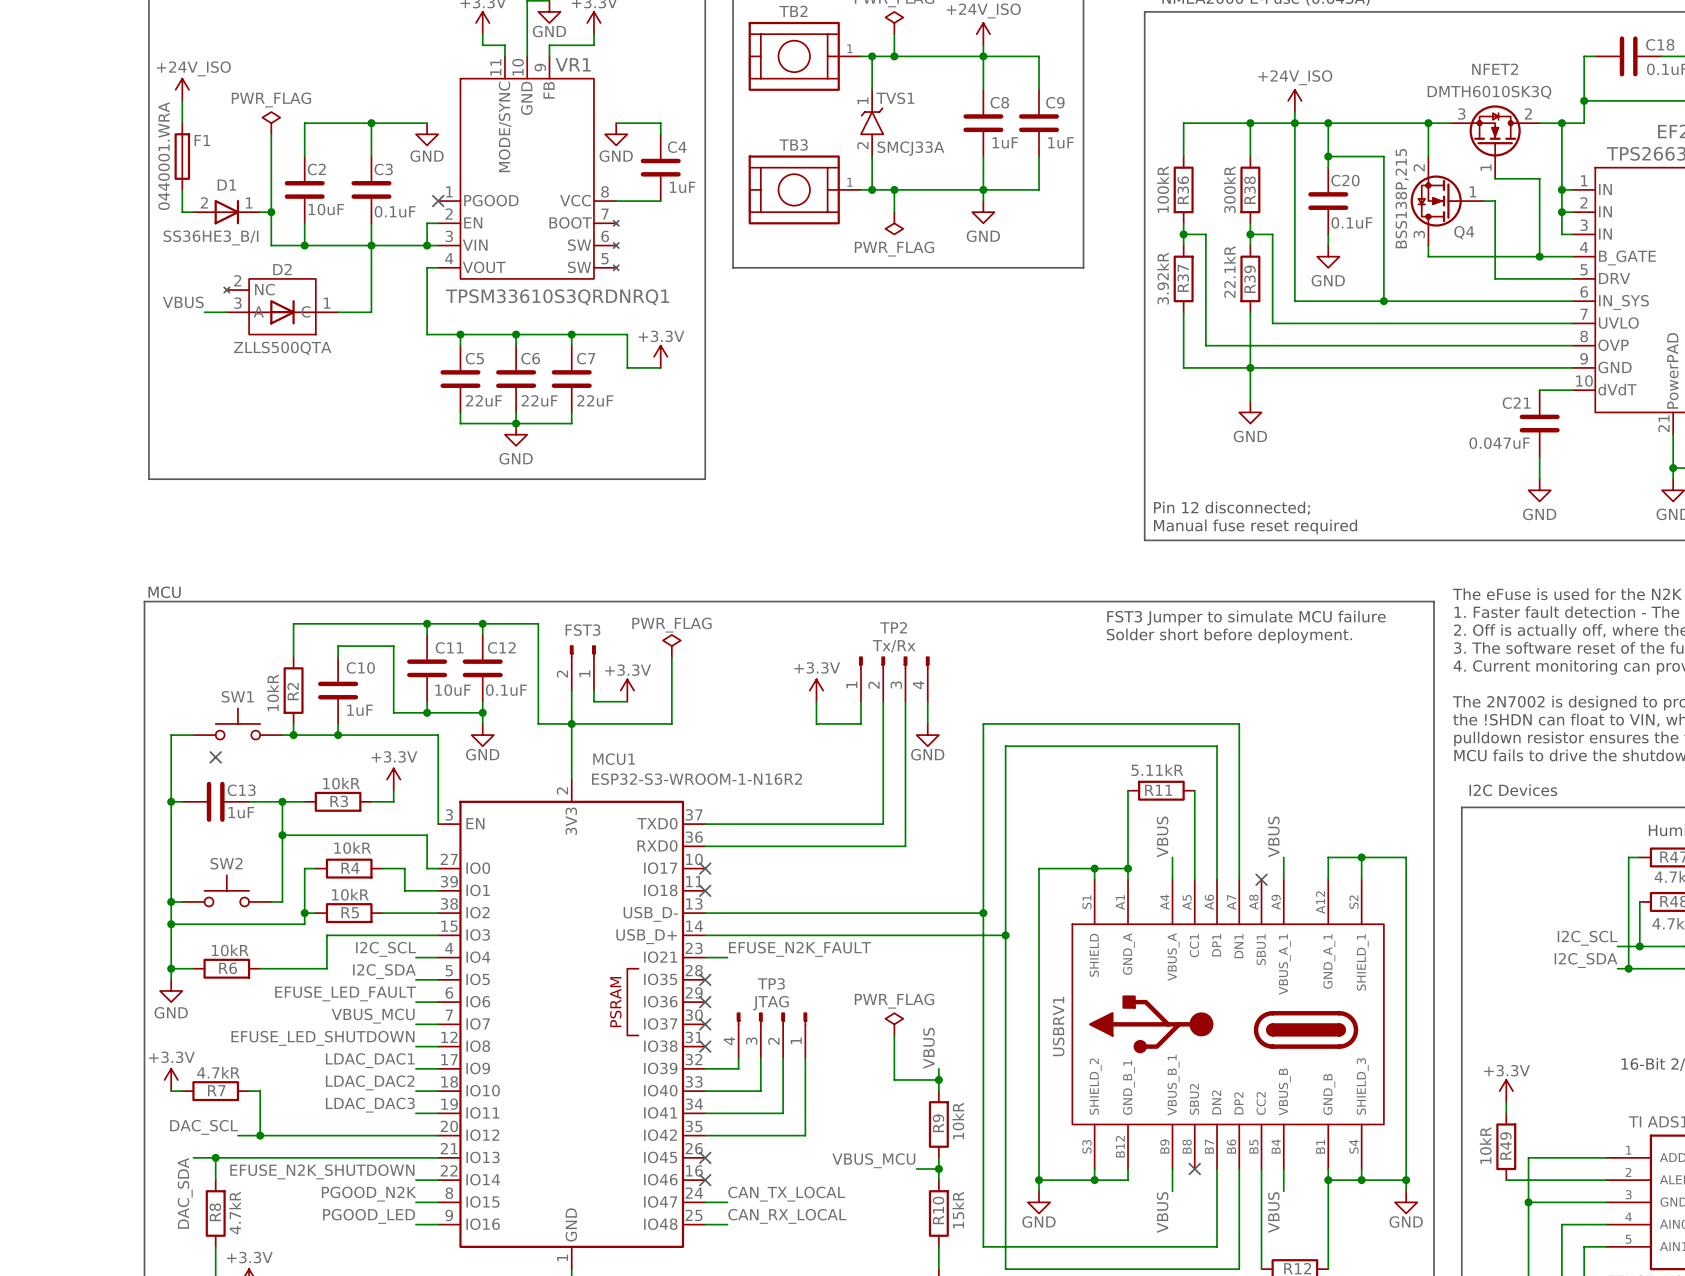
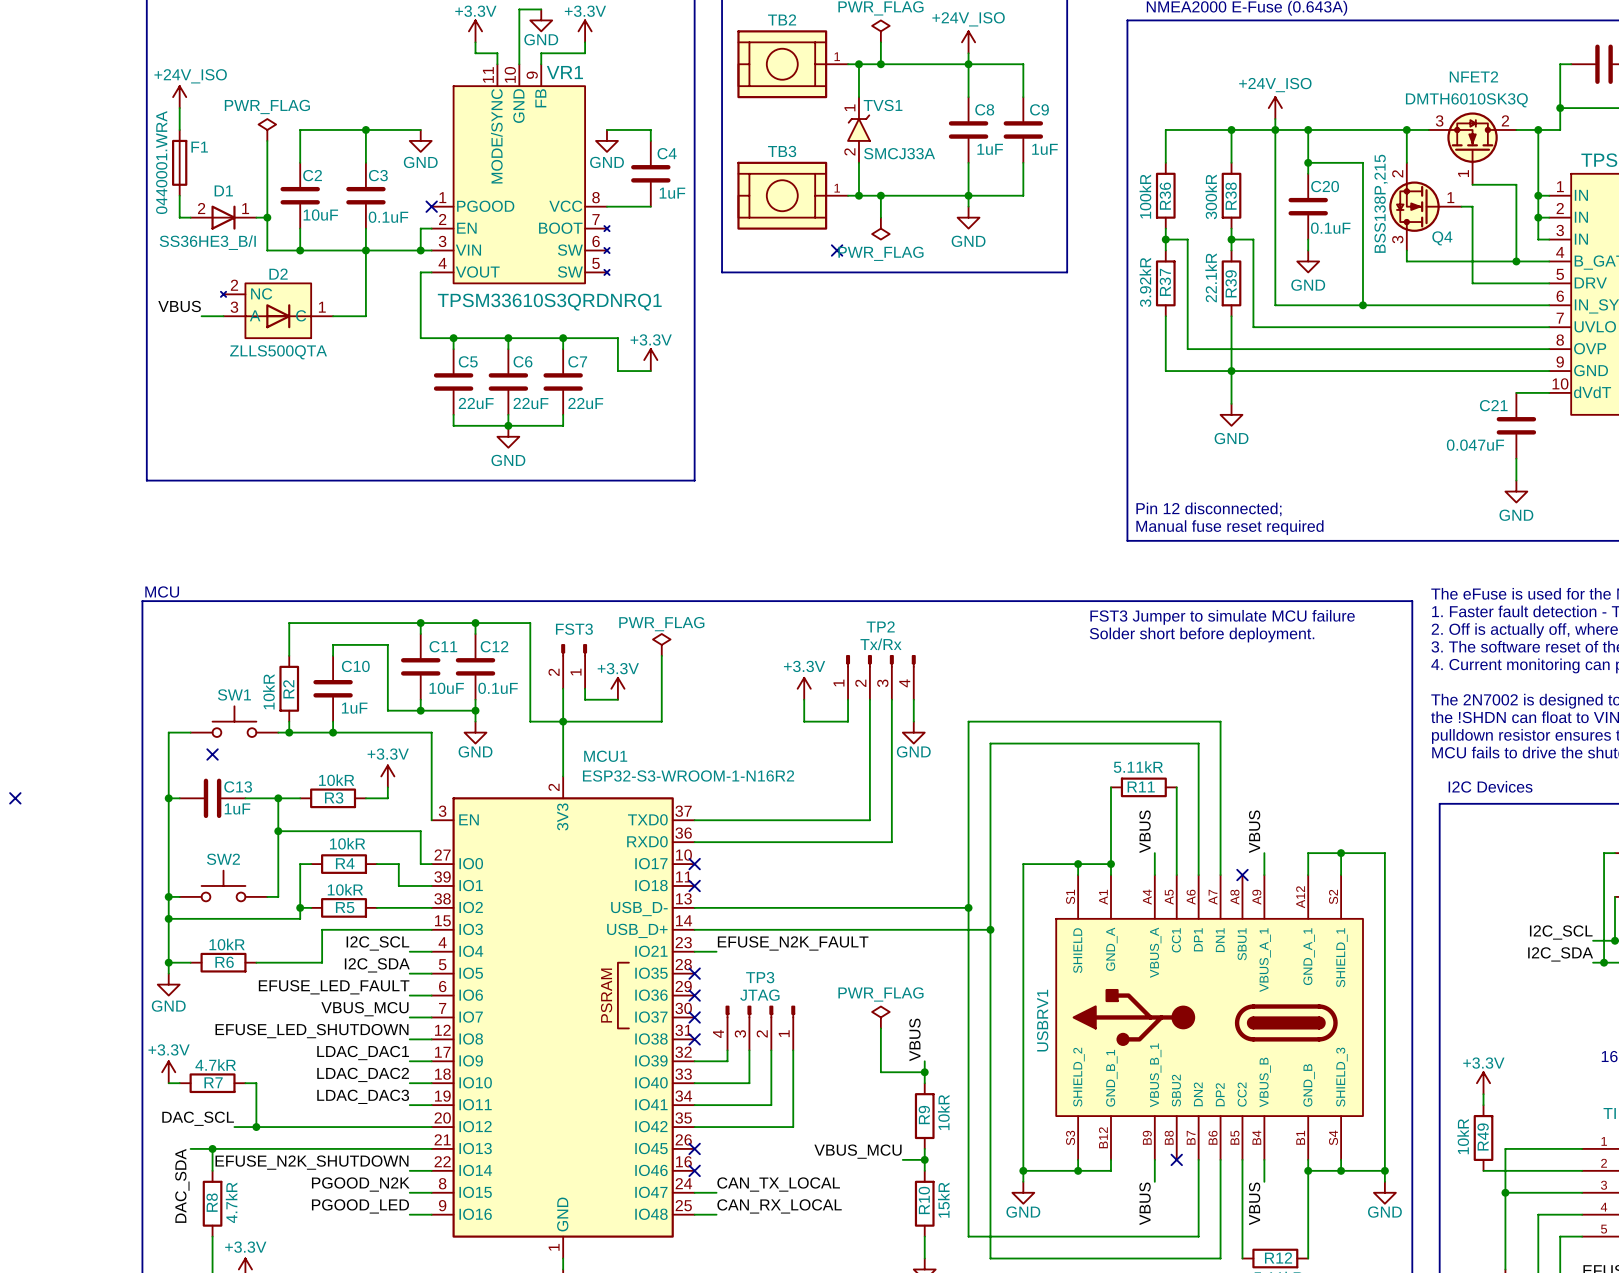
no-connect mark: none -> (837, 250)
no-connect mark: none -> (15, 798)

